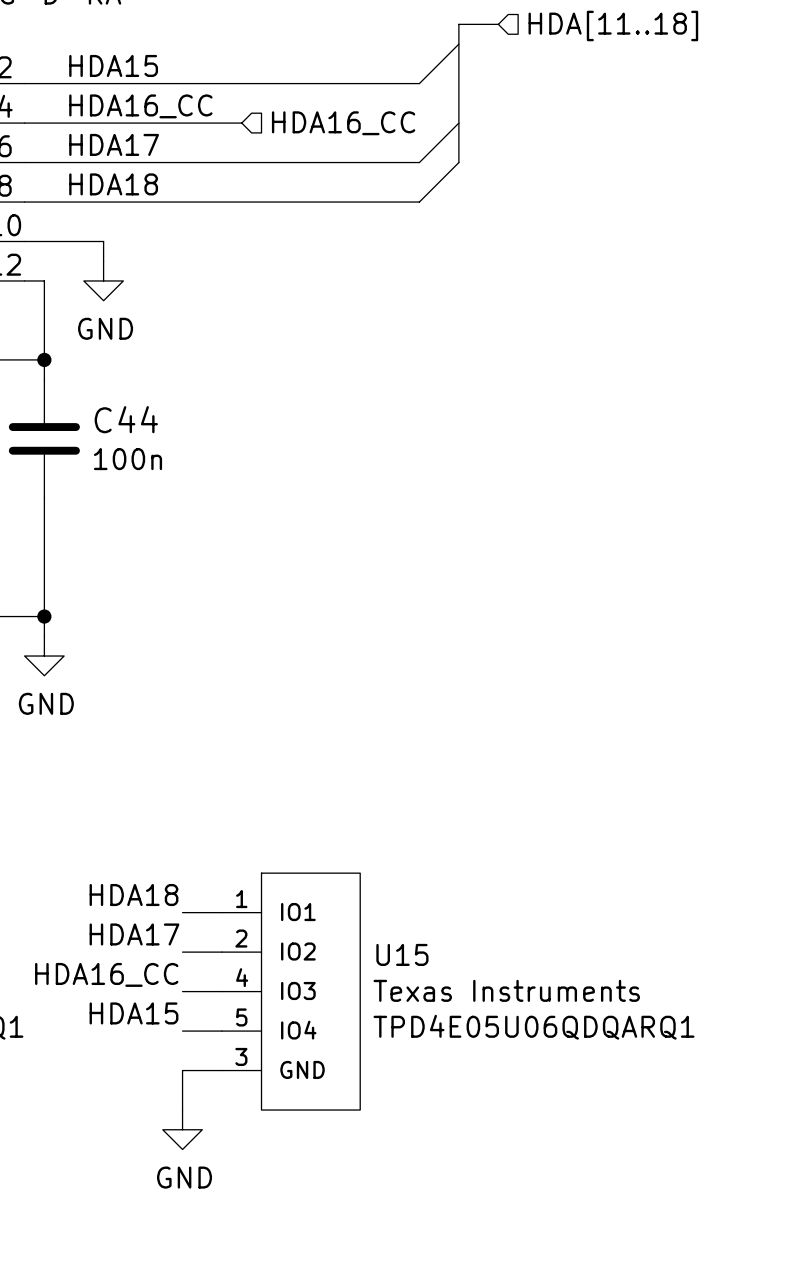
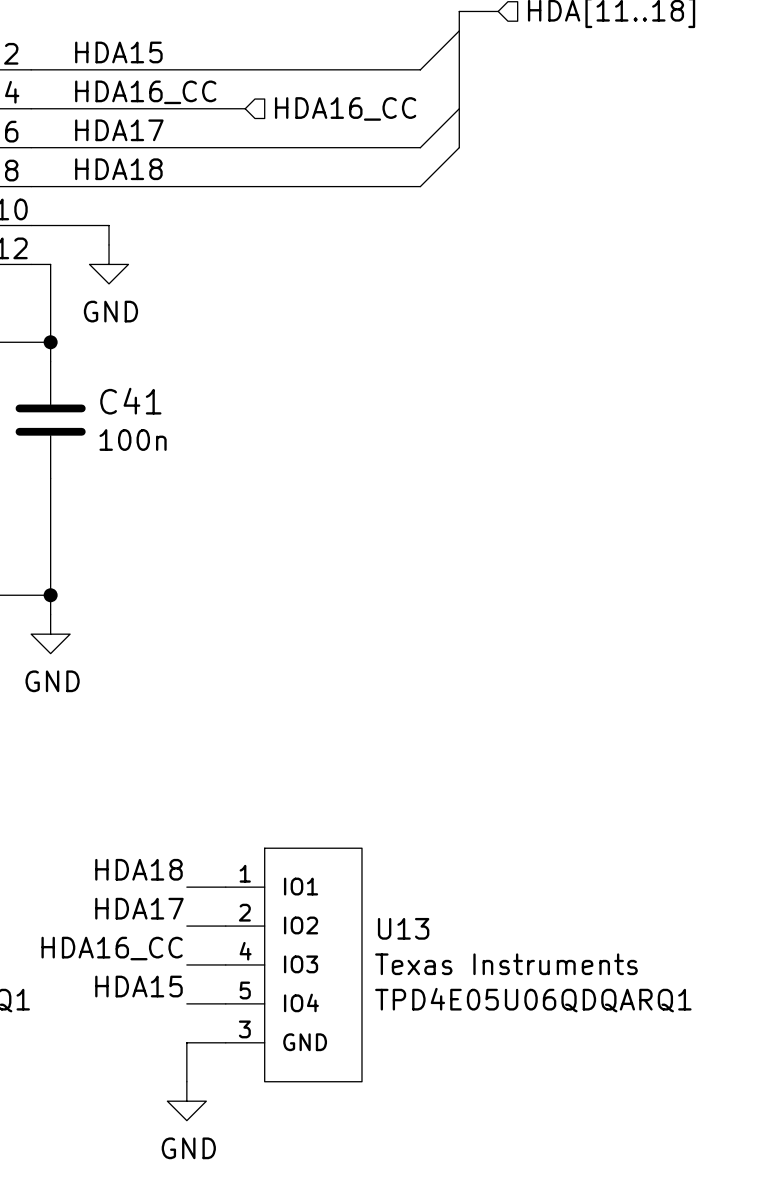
C44 name: C44 (126, 419) -> C41 (130, 401)
U15 name: U15 (402, 954) -> U13 (403, 928)

